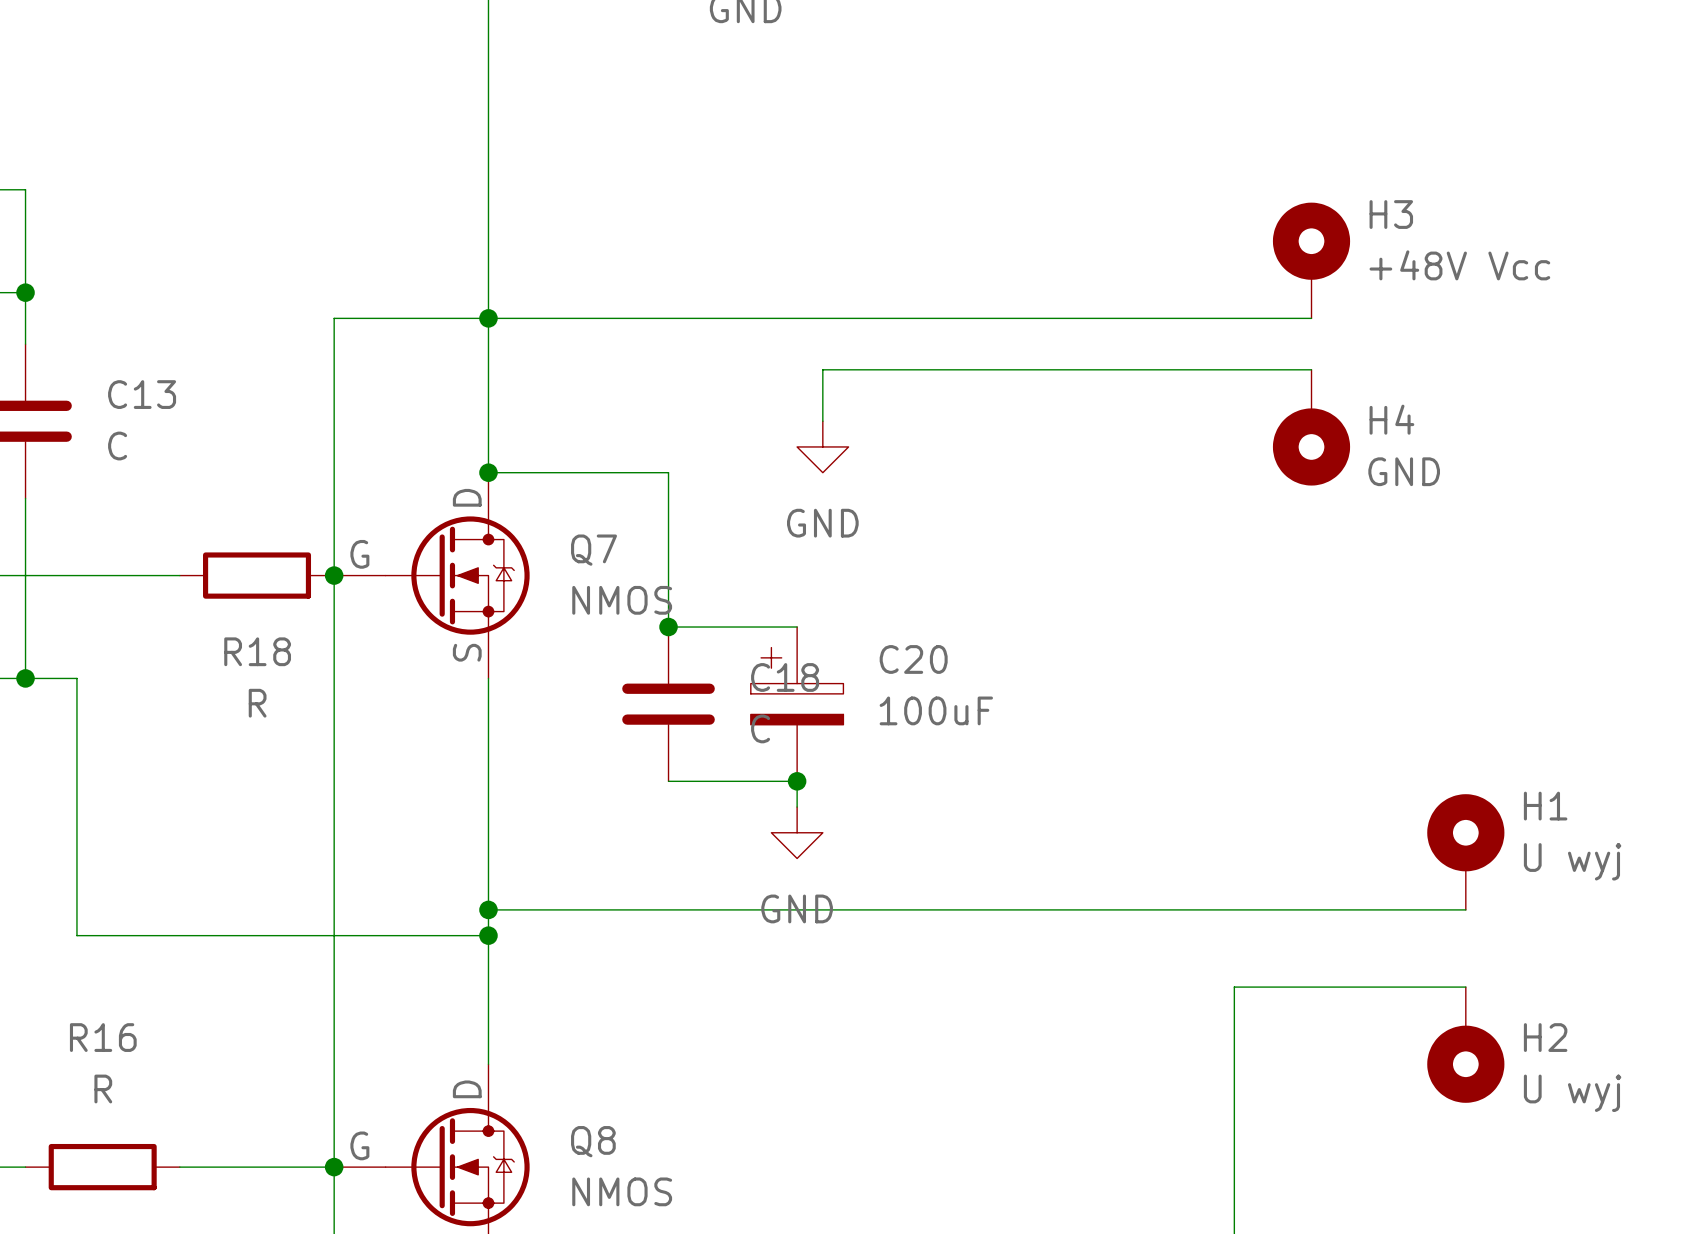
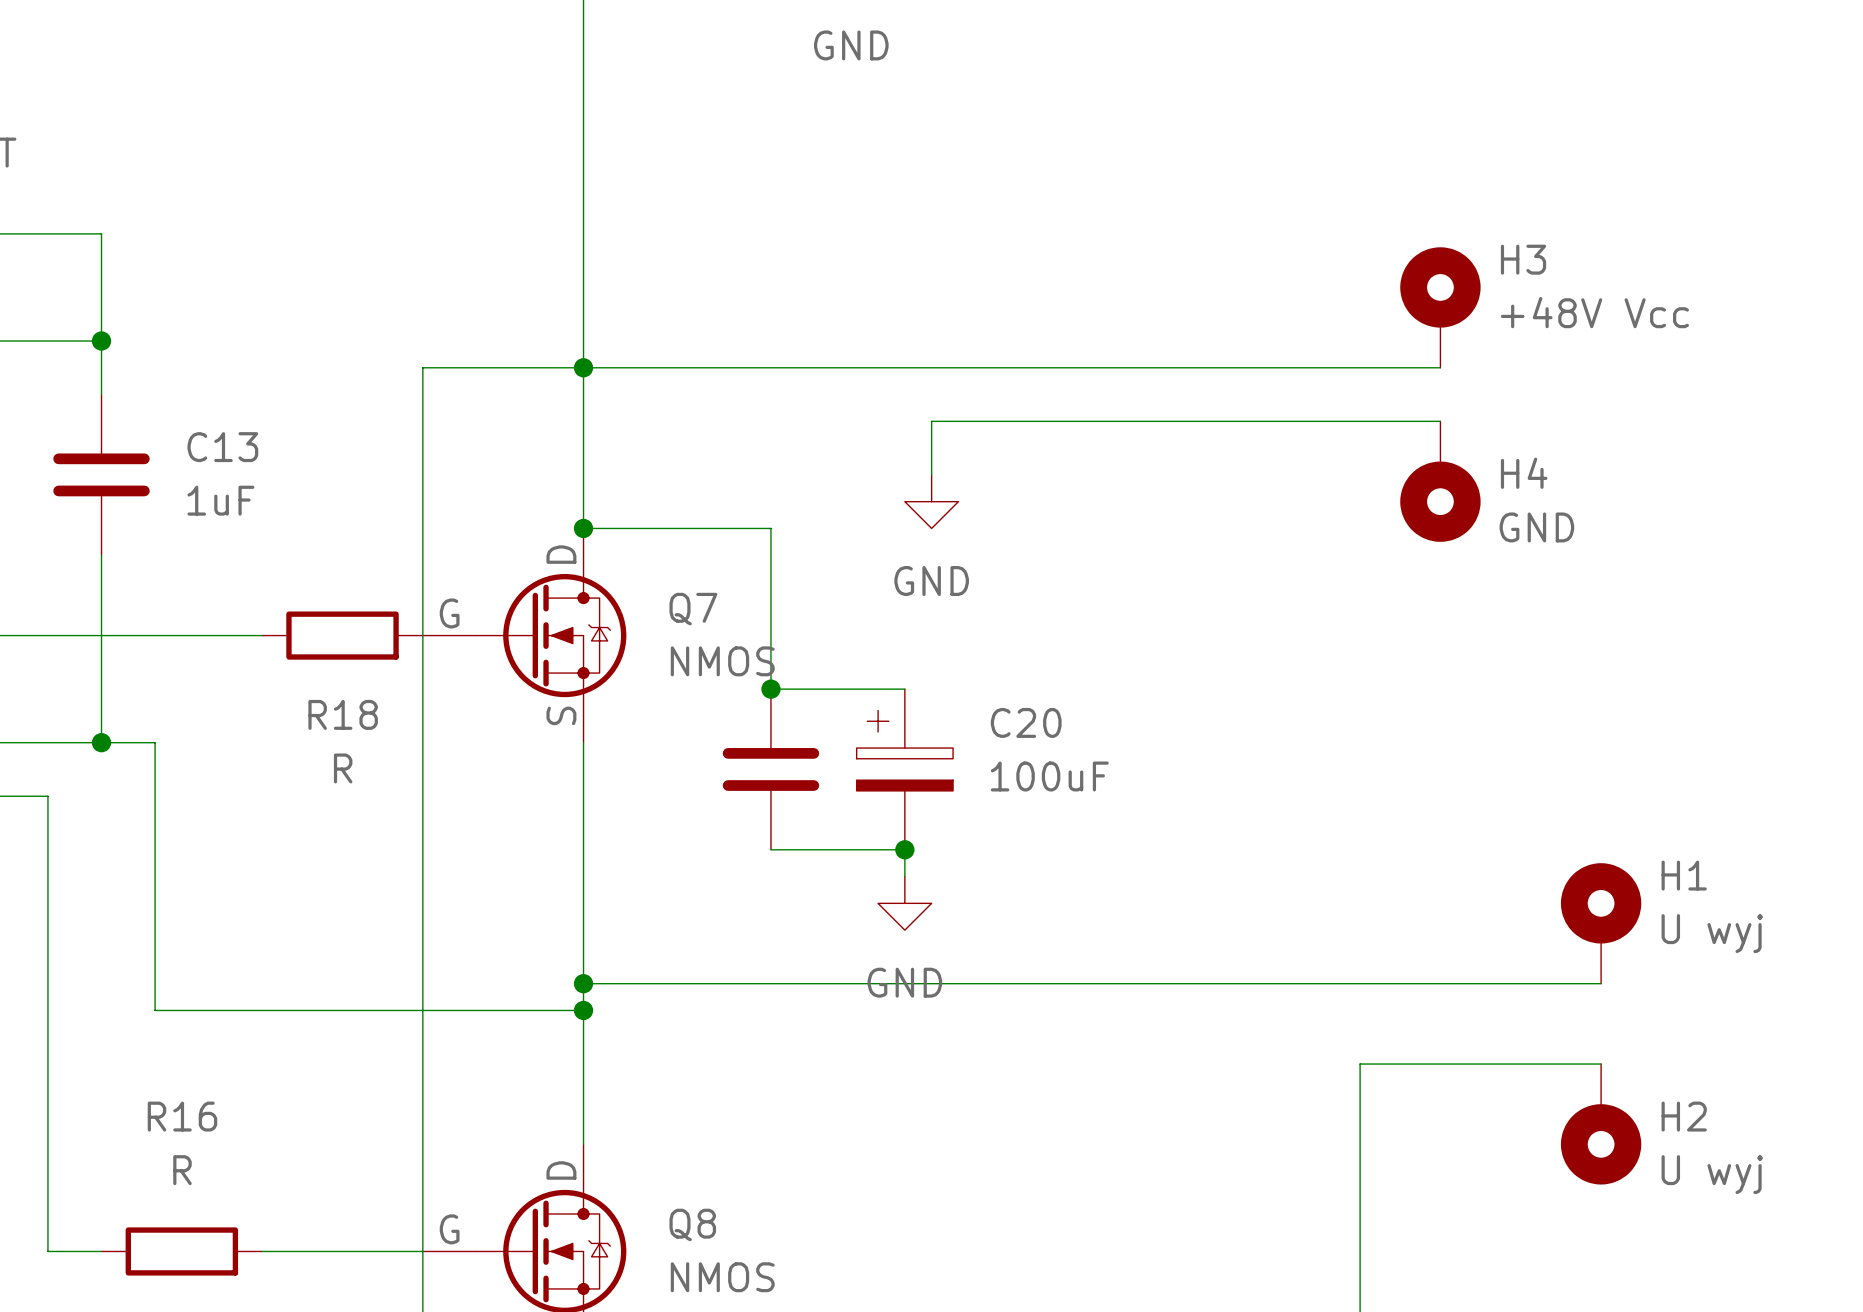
C13 value: C (117, 446) -> 1uF (220, 500)
junction: (334, 575) -> none
C18 name: C18 (785, 677) -> none
C18 value: C (760, 728) -> none
junction: (334, 1167) -> none

